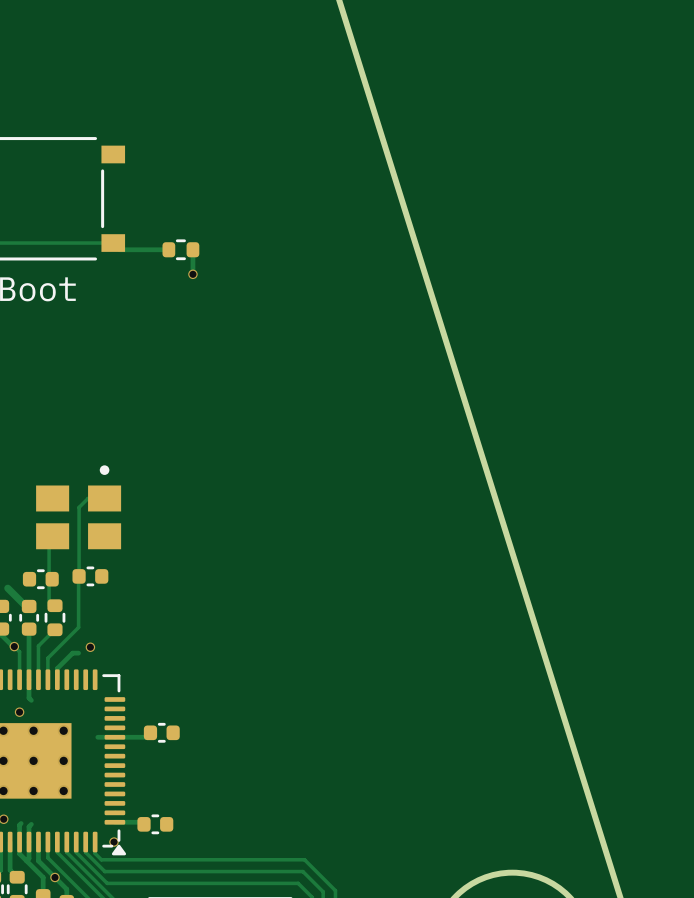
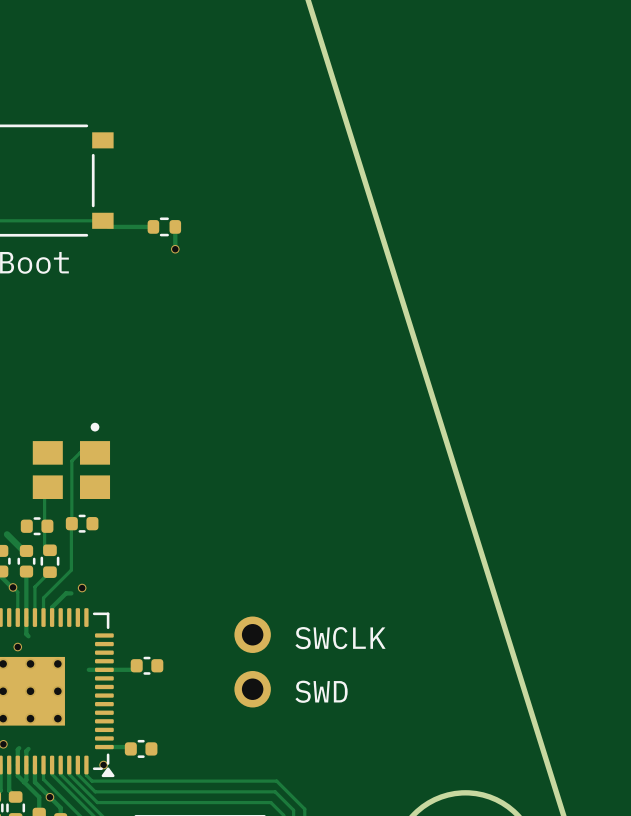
text: none -> SWCLK (340, 638)
part: none -> (252, 661)
text: none -> SWD (321, 691)

